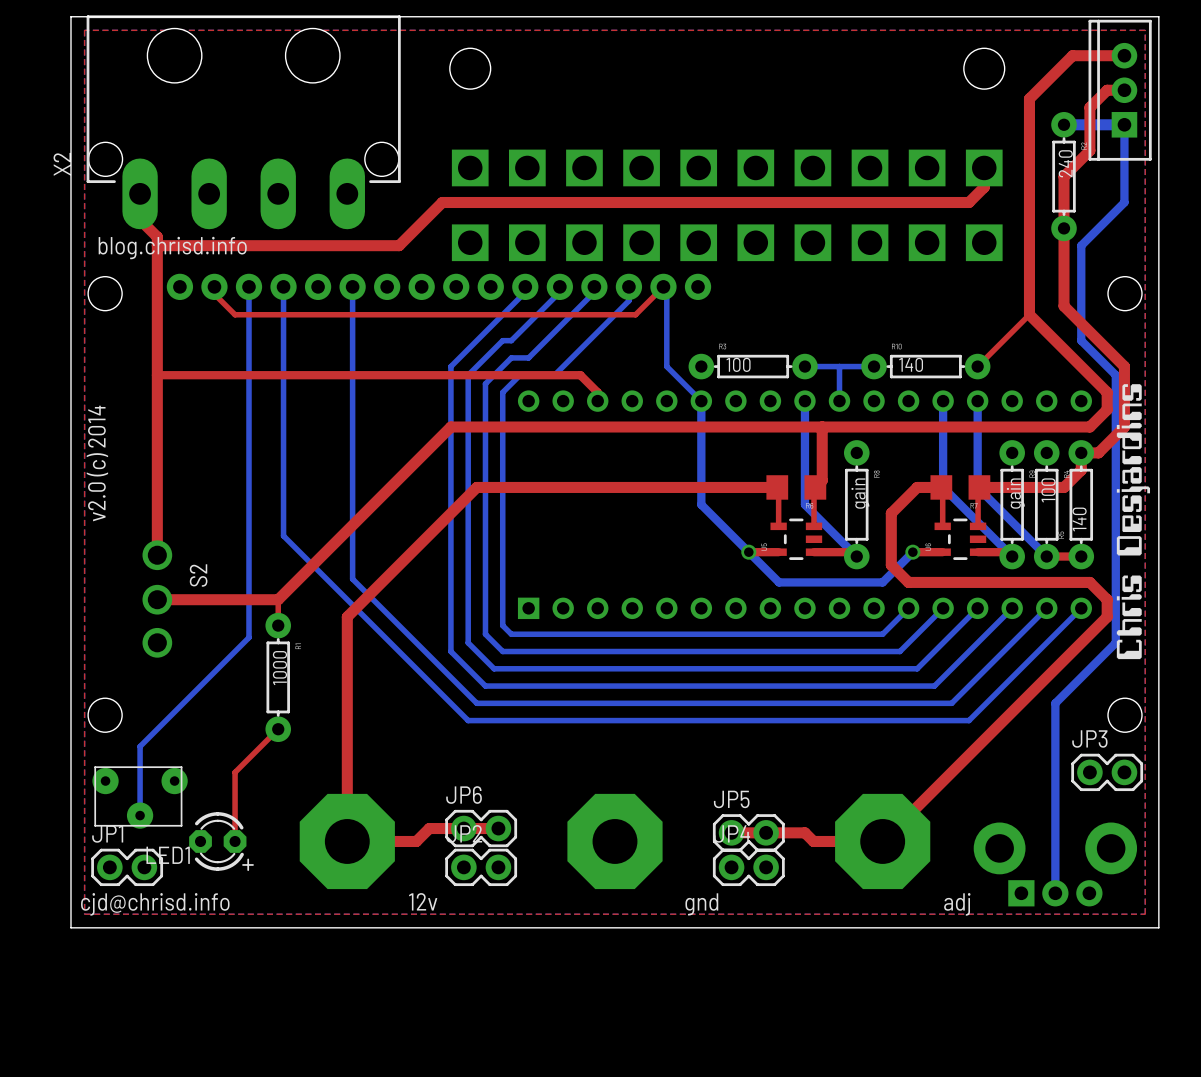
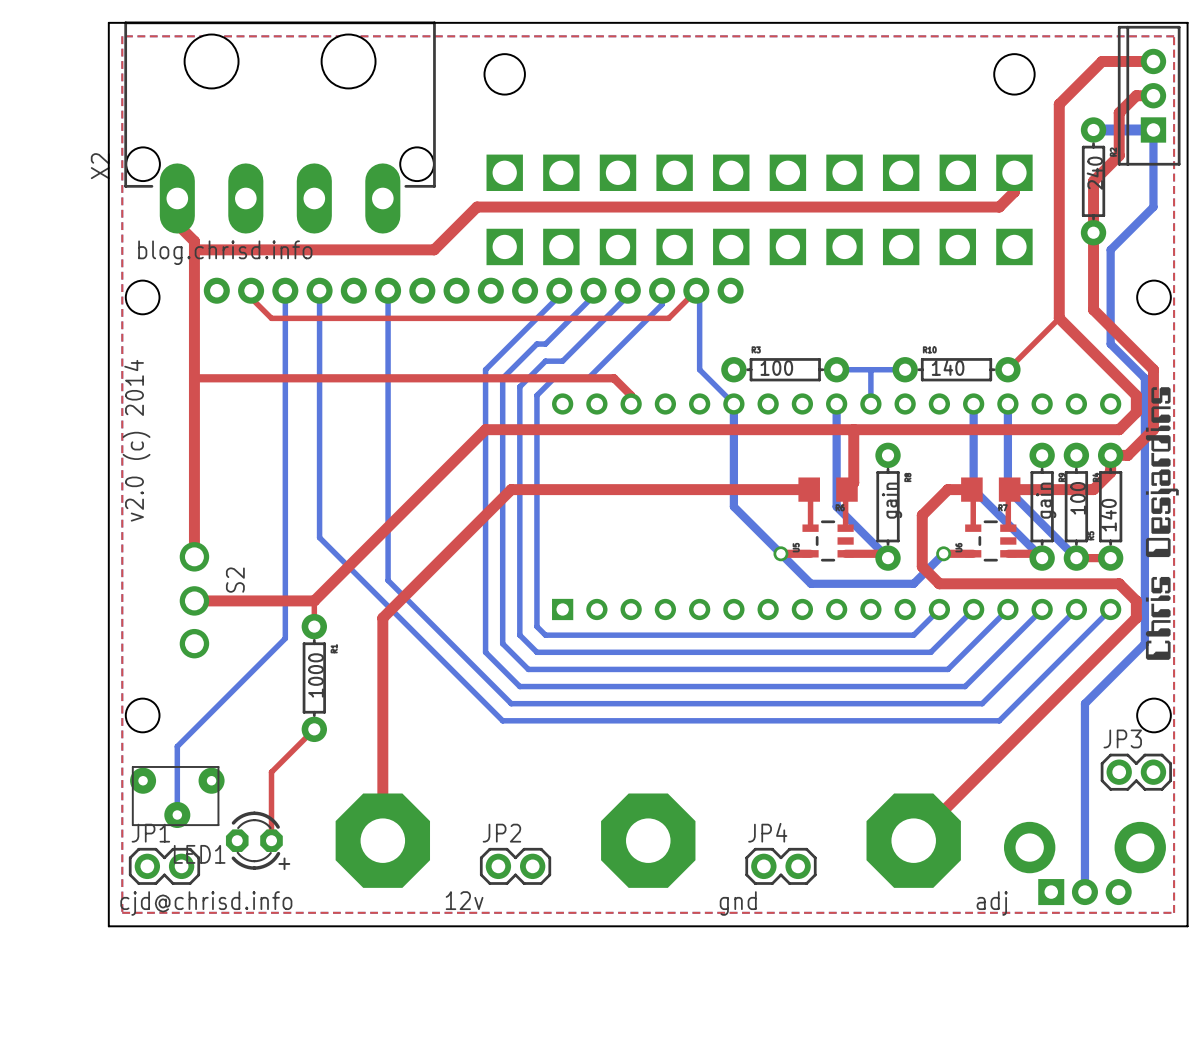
JP6: (481, 828) -> none
top track: (498, 828) (429, 828) (416, 841) (347, 841) -> none
top track: (731, 832) (804, 832) (813, 841) (882, 841) -> none
JP5: (748, 832) -> none

